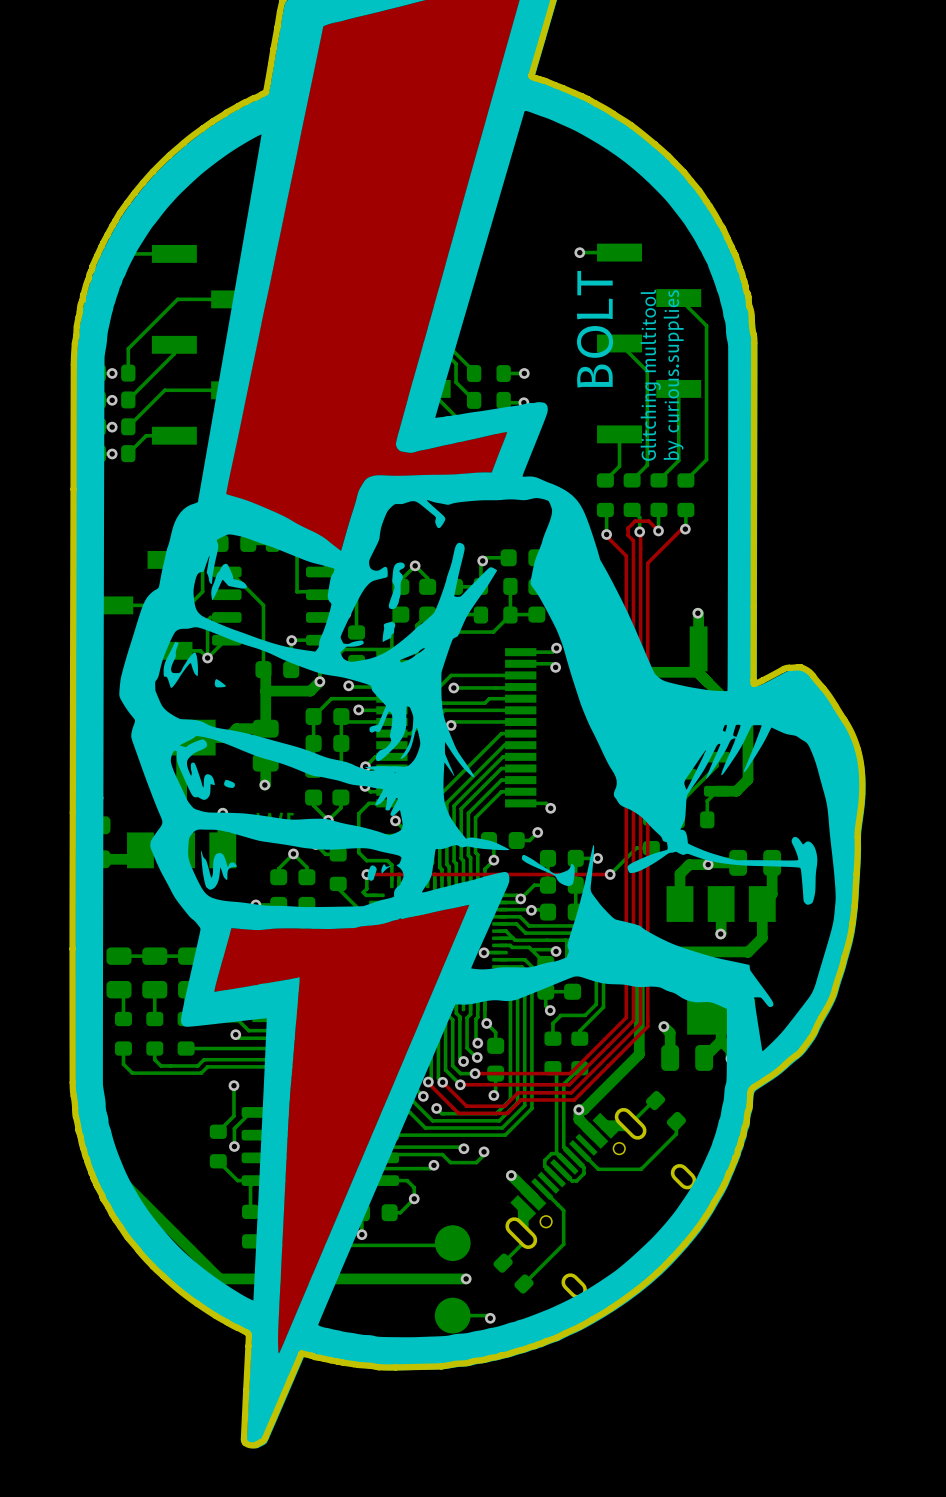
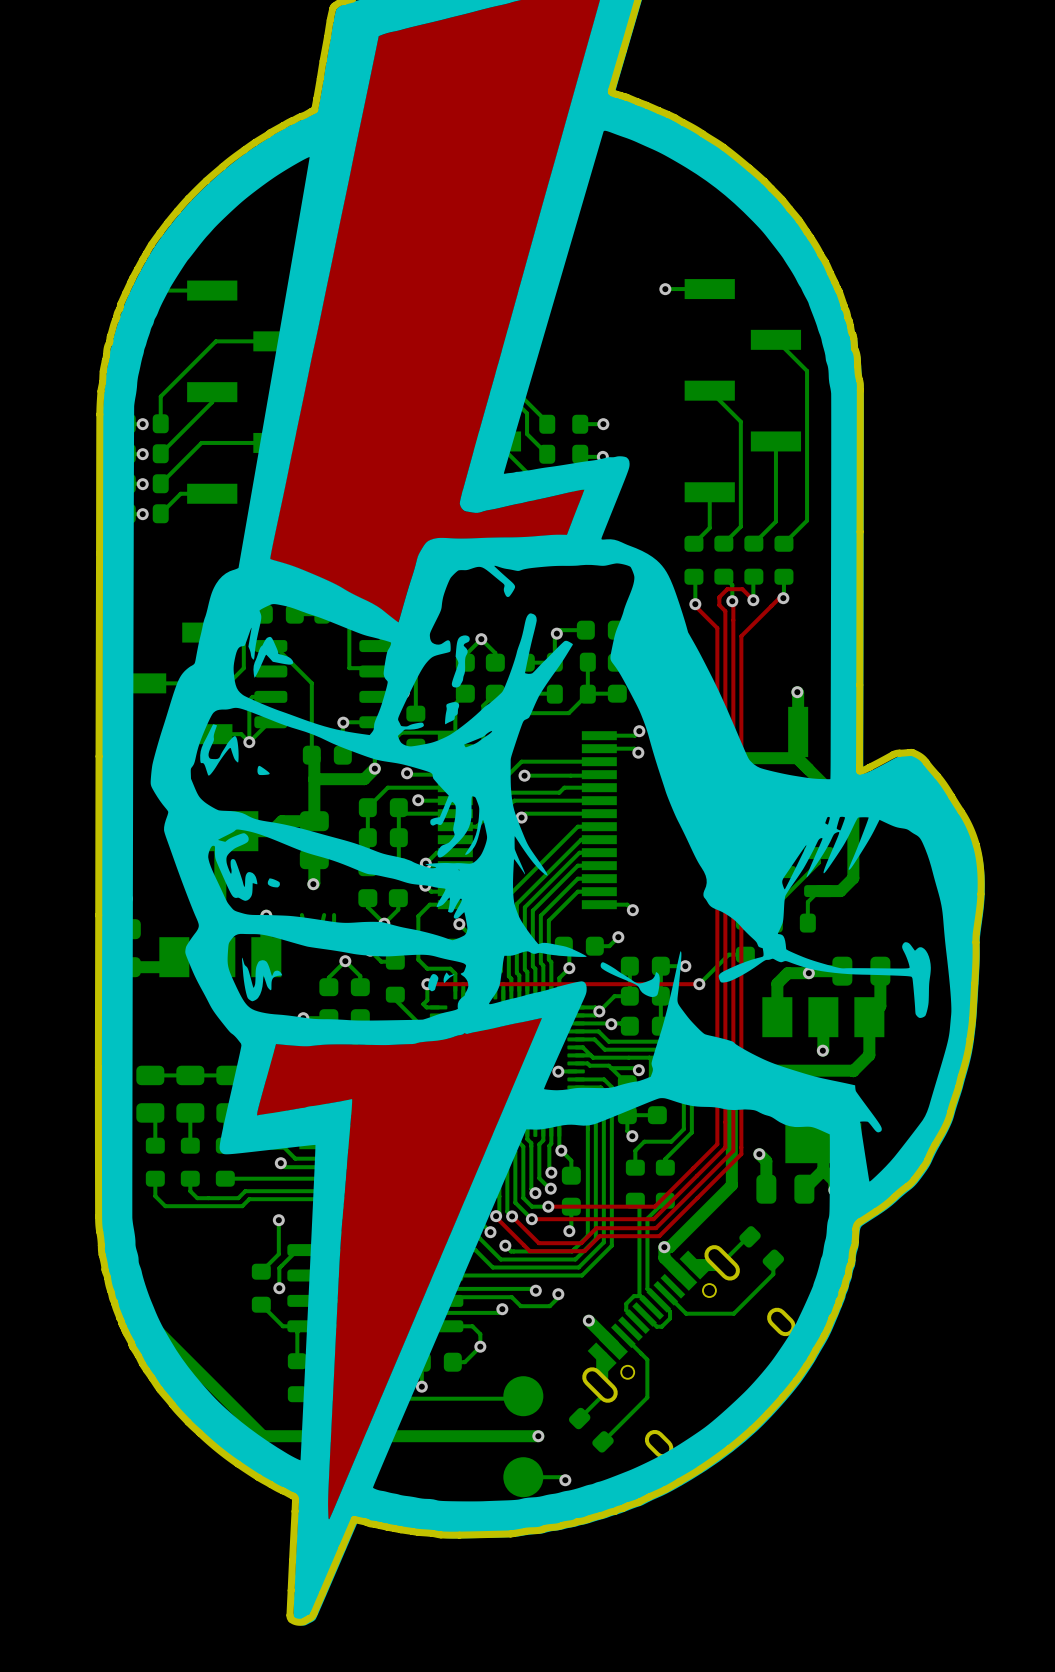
text: BOLT (594, 329) -> none
text: Glitching multitool (650, 375) -> none
text: by curious.supplies (673, 375) -> none

